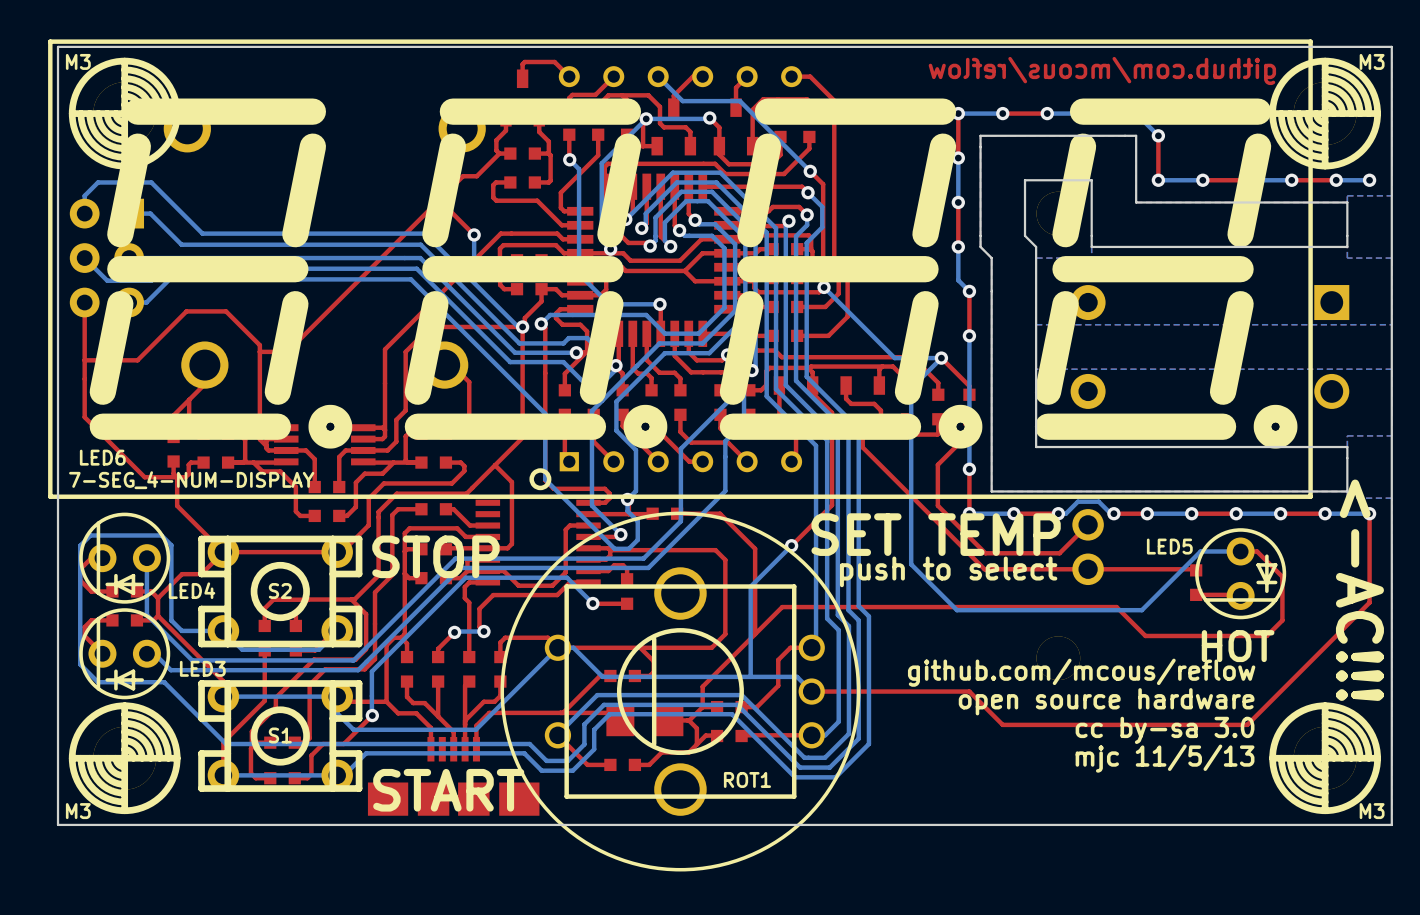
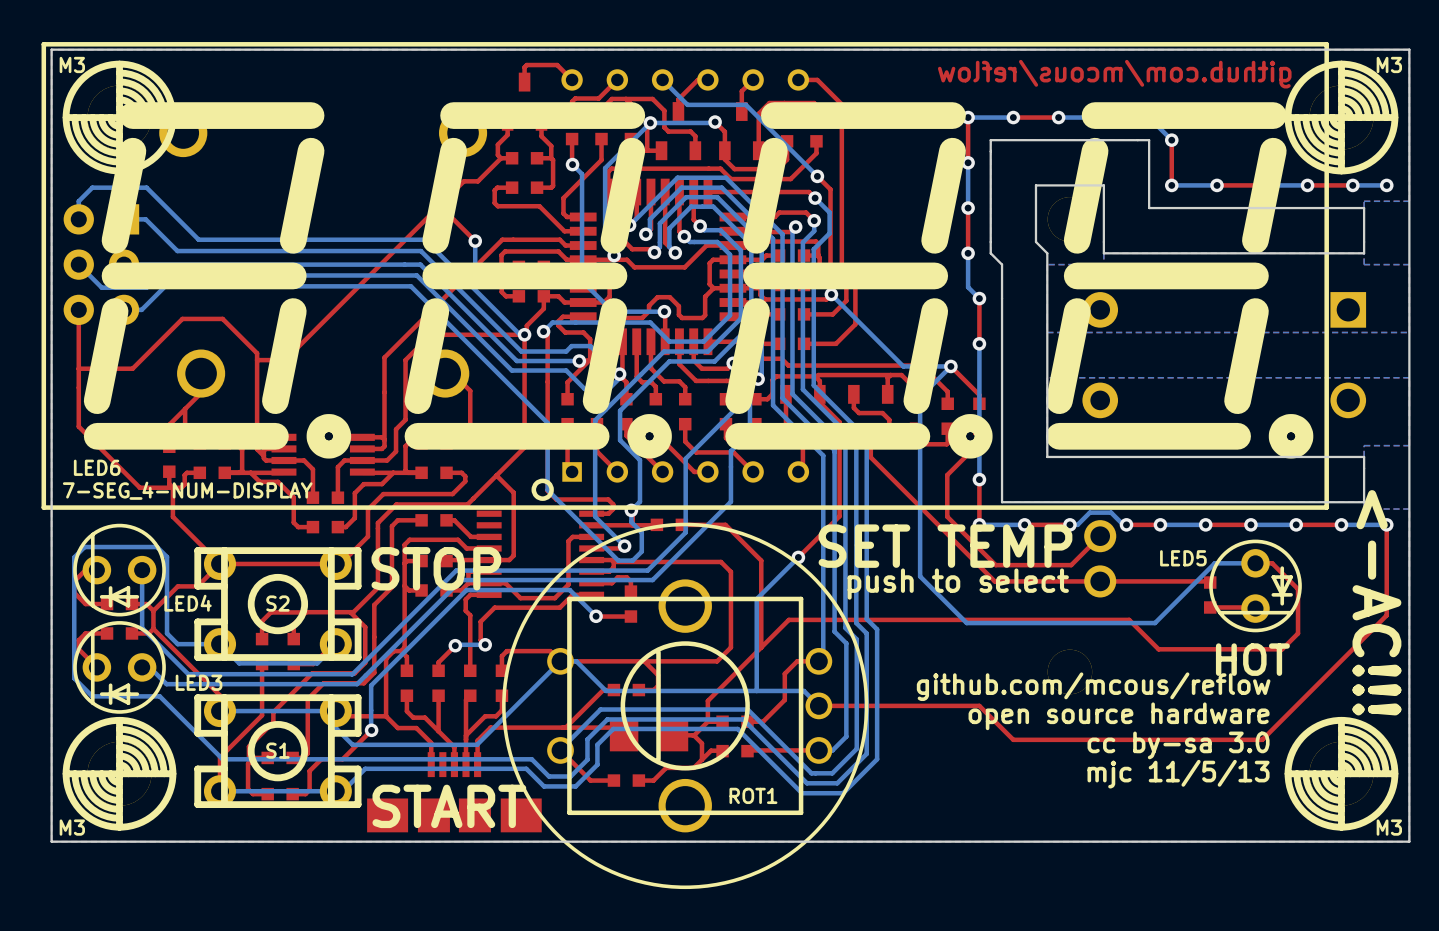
top track: (707, 253) (702, 253) (684, 270) -> (713, 259) (709, 263) (709, 284) (713, 288) (705, 296) (705, 315) (702, 318) (682, 318) (678, 314) (678, 306) (669, 297) (657, 297) (649, 305) (649, 311) (642, 318) (619, 318) (603, 302)
top track: (598, 267) (622, 267) (625, 270) (684, 270) -> none
top track: (684, 270) (695, 281) (708, 281) -> none

